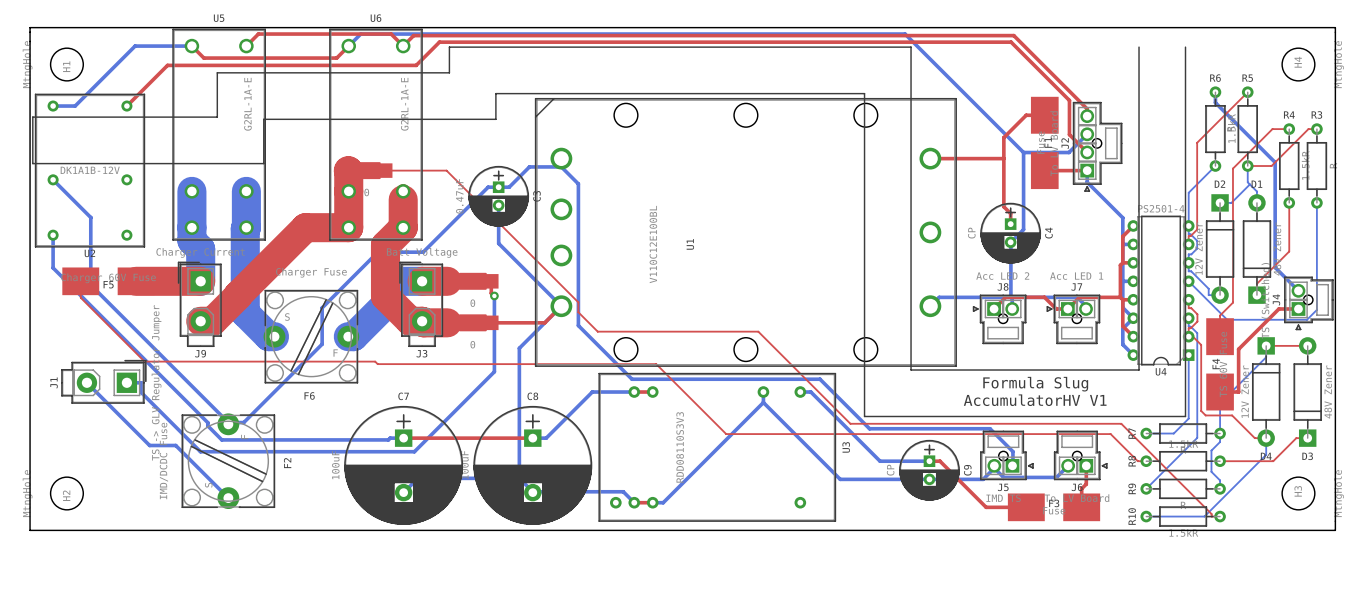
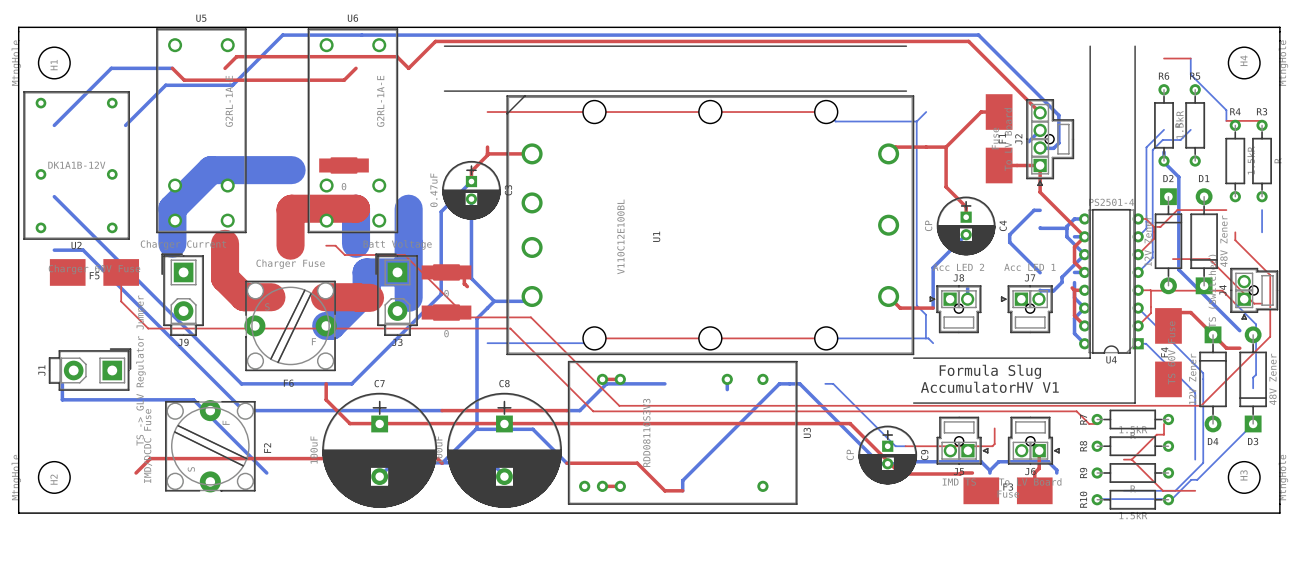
bottom track: (191, 46) (135, 46) (75, 106) (53, 106) -> none
top track: (191, 46) (203, 58) (336, 58) (348, 46) -> none
top track: (246, 46) (258, 34) (391, 34) (403, 46) (413, 35) (1013, 35) (1087, 108) (1087, 116) -> (225, 68) (236, 56) (397, 56) (408, 68) (435, 41) (968, 41) (1040, 112)
bottom track: (348, 46) (360, 34) (905, 34) (1023, 152) -> none
line: (470, 47) (449, 47) (449, 72) (217, 72) (217, 117) (32, 117) (32, 163) (263, 163) (263, 119) (495, 119) (495, 93) -> (444, 91) (468, 91)
line: (911, 47) (911, 369) -> (869, 46) (906, 46)
top track: none -> (1164, 58) (1190, 58)
bottom track: none -> (1190, 58) (1190, 74) (1226, 110) (1226, 120)
bottom track: none -> (172, 68) (111, 68) (54, 125)
top track: none -> (172, 68) (184, 80) (344, 80) (356, 68)
bottom track: (1215, 92) (1215, 102) (1275, 162) (1275, 267) (1298, 290) -> none
top track: (1247, 92) (1197, 142) (1197, 229) (1188, 235) (1188, 244) -> none
line: (864, 93) (864, 416) (956, 416) -> (824, 91) (906, 91)
top track: (126, 106) (167, 65) (416, 65) (439, 42) (1011, 42) (1069, 100) (1069, 134) (1087, 152) -> none
top track: none -> (487, 112) (826, 112)
bottom track: none -> (826, 112) (835, 121) (916, 121)
bottom track: none -> (926, 112) (916, 121)
top track: none -> (1226, 120) (1262, 120)
bottom track: none -> (916, 121) (916, 305) (925, 314) (925, 338)
bottom track: none -> (125, 125) (165, 85) (232, 85) (282, 35) (978, 35) (1058, 115) (1058, 143) (1053, 148) (1040, 147)
top track: (1289, 129) (1272, 129) (1232, 168) (1232, 302) (1220, 315) (1220, 336) -> none
top track: (1316, 129) (1308, 129) (1271, 166) (1247, 166) -> none
bottom track: none -> (1164, 129) (1146, 147) (1146, 228) (1138, 236)
top track: (1003, 137) (1003, 206) -> (946, 147) (946, 186) (959, 200)
top track: none -> (959, 133) (946, 147)
bottom track: (1075, 145) (1068, 152) (1023, 152) -> none
top track: none -> (487, 147) (487, 155) (471, 171) (471, 181)
bottom track: (1023, 152) (1023, 229) (1010, 242) (1010, 297) -> none
bottom track: none -> (1164, 152) (1164, 162) (1178, 177) (1178, 269) (1239, 330)
top track: none -> (487, 153) (532, 153)
top track: (930, 158) (1003, 158) -> (888, 153) (895, 147) (946, 147)
bottom track: (561, 166) (578, 183) (578, 325) (632, 379) (820, 379) (869, 428) (990, 428) (1012, 451) (1012, 465) -> none
bottom track: (561, 166) (529, 166) (509, 187) (488, 187) (423, 252) (377, 252) (322, 307) (322, 344) (243, 422) (228, 422) -> none
bottom track: (1215, 166) (1188, 192) (1188, 234) (1197, 240) (1197, 248) (1188, 254) (1188, 271) (1191, 271) (1208, 288) (1208, 295) (1220, 295) -> none
bottom track: (1247, 166) (1247, 182) (1256, 191) (1256, 202) -> none
top track: (348, 170) (348, 227) (305, 227) (212, 321) (200, 321) -> none
top track: (385, 170) (446, 170) (578, 302) (578, 312) (597, 331) (758, 331) (850, 423) (1121, 423) (1211, 514) (1211, 516) (1220, 516) -> none
bottom track: (1087, 170) (1087, 182) (1122, 217) (1122, 291) -> none
bottom track: none -> (291, 170) (210, 170) (172, 208) (172, 243)
bottom track: (53, 179) (90, 217) (90, 285) (228, 422) -> none
bottom track: (1249, 184) (1231, 202) (1220, 202) -> none
bottom track: none -> (471, 181) (441, 211) (441, 294) (351, 383) (241, 383) (54, 196)
bottom track: (191, 191) (191, 240) (200, 249) (200, 281) -> none
bottom track: (246, 191) (245, 313) (268, 336) (274, 336) -> none
top track: (403, 191) (403, 227) (385, 245) (385, 296) (410, 321) (454, 322) -> none
top track: (1289, 202) (1289, 239) -> none
bottom track: (1316, 202) (1316, 216) -> none
bottom track: none -> (356, 208) (356, 243)
top track: none -> (356, 208) (291, 208) (290, 245)
bottom track: none -> (408, 208) (408, 297)
top track: none -> (1226, 210) (1177, 210) (1160, 226) (1154, 226)
bottom track: none -> (1040, 210) (1034, 210) (1009, 234) (1009, 242) (1040, 272)
bottom track: none -> (1084, 218) (1074, 218) (1066, 226) (1066, 236) (1084, 254) (1062, 277) (1062, 282) (1053, 290) (1040, 290)
top track: (1133, 225) (1122, 236) (1122, 254) -> (1040, 165) (1040, 192) (1084, 236) (1074, 246)
top track: none -> (1138, 218) (1146, 218) (1154, 226)
top track: none -> (1154, 226) (1154, 238) (1138, 254)
bottom track: (53, 235) (53, 267) (207, 422) (207, 425) (221, 439) (388, 439) (390, 438) (403, 438) -> none
bottom track: none -> (1040, 227) (1066, 228)
bottom track: (1316, 239) (1316, 309) (1307, 319) (1227, 319) (1188, 281) -> (1190, 129) (1180, 139) (1162, 139) (1152, 150) (1152, 257) (1138, 272)
bottom track: none -> (966, 234) (933, 267) (933, 308)
bottom track: (498, 243) (561, 306) -> (471, 235) (471, 278) (494, 301)
top track: (1289, 247) (1289, 251) (1256, 283) (1256, 295) -> (1235, 240) (1270, 275) (1270, 336) (1201, 405) (619, 405) (530, 317) (467, 317) (404, 255) (344, 255) (335, 245) (326, 245)
top track: none -> (225, 243) (225, 278) (244, 297) (271, 297)
bottom track: none -> (54, 250) (83, 250) (243, 410) (442, 410)
top track: none -> (1074, 254) (1074, 262) (1084, 272)
top track: (1133, 262) (1122, 262) (1120, 265) (1120, 297) (1079, 297) (1067, 308) (1056, 308) (1044, 297) (1005, 297) (994, 308) -> none
top track: none -> (1172, 259) (1209, 259) (1254, 303) (1262, 303)
top track: (80, 281) (80, 297) (144, 361) (656, 364) (726, 434) (1110, 434) (1137, 461) (1146, 461) -> none
top track: (136, 281) (200, 281) -> none
top track: (422, 281) (454, 281) -> none
top track: none -> (121, 285) (121, 301) (148, 328) (510, 328) (593, 411) (1076, 411) (1089, 423) (1097, 423)
bottom track: (494, 295) (494, 371) (414, 451) (200, 451) (141, 393) (141, 382) (126, 382) -> none
via: (494, 295) -> none
top track: (1188, 299) (1188, 308) (1191, 308) (1197, 314) (1197, 321) (1188, 328) (1188, 336) -> (1150, 290) (1150, 313) (1138, 325)
top track: none -> (1138, 290) (1150, 290)
top track: none -> (1150, 290) (1222, 290) (1235, 303)
top track: none -> (324, 297) (370, 297)
top track: (561, 306) (544, 322) (491, 322) -> none
bottom track: (930, 306) (939, 297) (1077, 297) (1086, 306) (1086, 308) -> none
top track: none -> (888, 296) (900, 308) (933, 308)
top track: (1298, 308) (1278, 308) (1238, 349) (1238, 392) (1220, 392) -> none
bottom track: none -> (494, 301) (477, 318) (477, 429)
bottom track: (556, 311) (519, 348) (519, 478) -> (527, 301) (494, 301)
bottom track: none -> (1235, 303) (1256, 324) (1256, 374) (1253, 377) (1253, 388)
bottom track: (1188, 318) (1188, 326) (1197, 333) (1197, 437) (1146, 488) -> (1138, 308) (1203, 373) (1203, 462) (1175, 490) (1123, 490)
top track: none -> (1172, 312) (1190, 312) (1226, 348) (1239, 348)
top track: (1188, 332) (1201, 344) (1201, 410) (1205, 415) (1232, 415) (1254, 438) (1266, 438) -> none
bottom track: (1266, 345) (1266, 357) (1220, 403) (1220, 441) (1211, 450) (1211, 471) (1220, 480) (1220, 488) -> none
top track: (1266, 345) (1307, 345) -> none
bottom track: none -> (594, 338) (589, 343) (487, 343)
top track: none -> (594, 338) (826, 338)
bottom track: none -> (826, 338) (928, 338) (933, 343)
bottom track: (1188, 355) (1188, 418) (1173, 433) (1146, 433) -> (1138, 343) (1146, 343) (1195, 392) (1195, 459)
line: (911, 370) (956, 370) -> none
bottom track: (86, 382) (149, 445) (175, 445) (228, 498) -> none
bottom track: (634, 392) (592, 392) (546, 438) (532, 438) -> none
bottom track: (800, 392) (810, 392) (880, 461) (929, 461) -> none
bottom track: none -> (62, 383) (62, 399) (193, 399) (266, 472)
top track: none -> (326, 383) (326, 399) (349, 423) (850, 423) (900, 474) (972, 472)
bottom track: none -> (664, 383) (606, 383) (579, 410) (566, 410)
bottom track: none -> (825, 383) (833, 383) (895, 446) (905, 446)
top track: (403, 438) (532, 438) -> (442, 410) (566, 410)
top track: none -> (1164, 423) (1164, 434) (1156, 434) (1131, 459)
bottom track: (1266, 438) (1266, 454) (1204, 516) (1146, 516) -> none
bottom track: none -> (1253, 423) (1197, 479) (1191, 479) (1172, 499) (1100, 499) (1097, 495)
top track: (1307, 438) (1296, 438) (1273, 461) (1220, 461) -> none
top track: none -> (994, 428) (994, 444) (992, 446) (905, 446)
top track: (929, 461) (940, 461) (986, 507) (1026, 507) -> none
bottom track: (1068, 465) (1056, 477) (1003, 477) (994, 468) -> none
bottom track: (994, 468) (983, 479) (947, 479) -> (989, 470) (981, 461) (907, 461) (905, 463)
top track: none -> (1123, 459) (1131, 459)
top track: none -> (1131, 459) (1163, 490) (1195, 490)
bottom track: none -> (442, 463) (475, 429) (532, 429) (566, 463)
top track: none -> (442, 463) (437, 458) (150, 458) (136, 472)
top track: none -> (566, 463) (637, 463) (664, 490) (682, 490)
bottom track: (921, 479) (840, 479) (763, 402) (663, 502) (652, 502) -> (879, 463) (799, 383) (779, 383) (682, 480) (682, 490)
bottom track: none -> (989, 470) (998, 461) (1048, 461) (1056, 470) (1056, 472)
bottom track: none -> (989, 470) (989, 472)
bottom track: (532, 492) (623, 491) (634, 502) -> none

